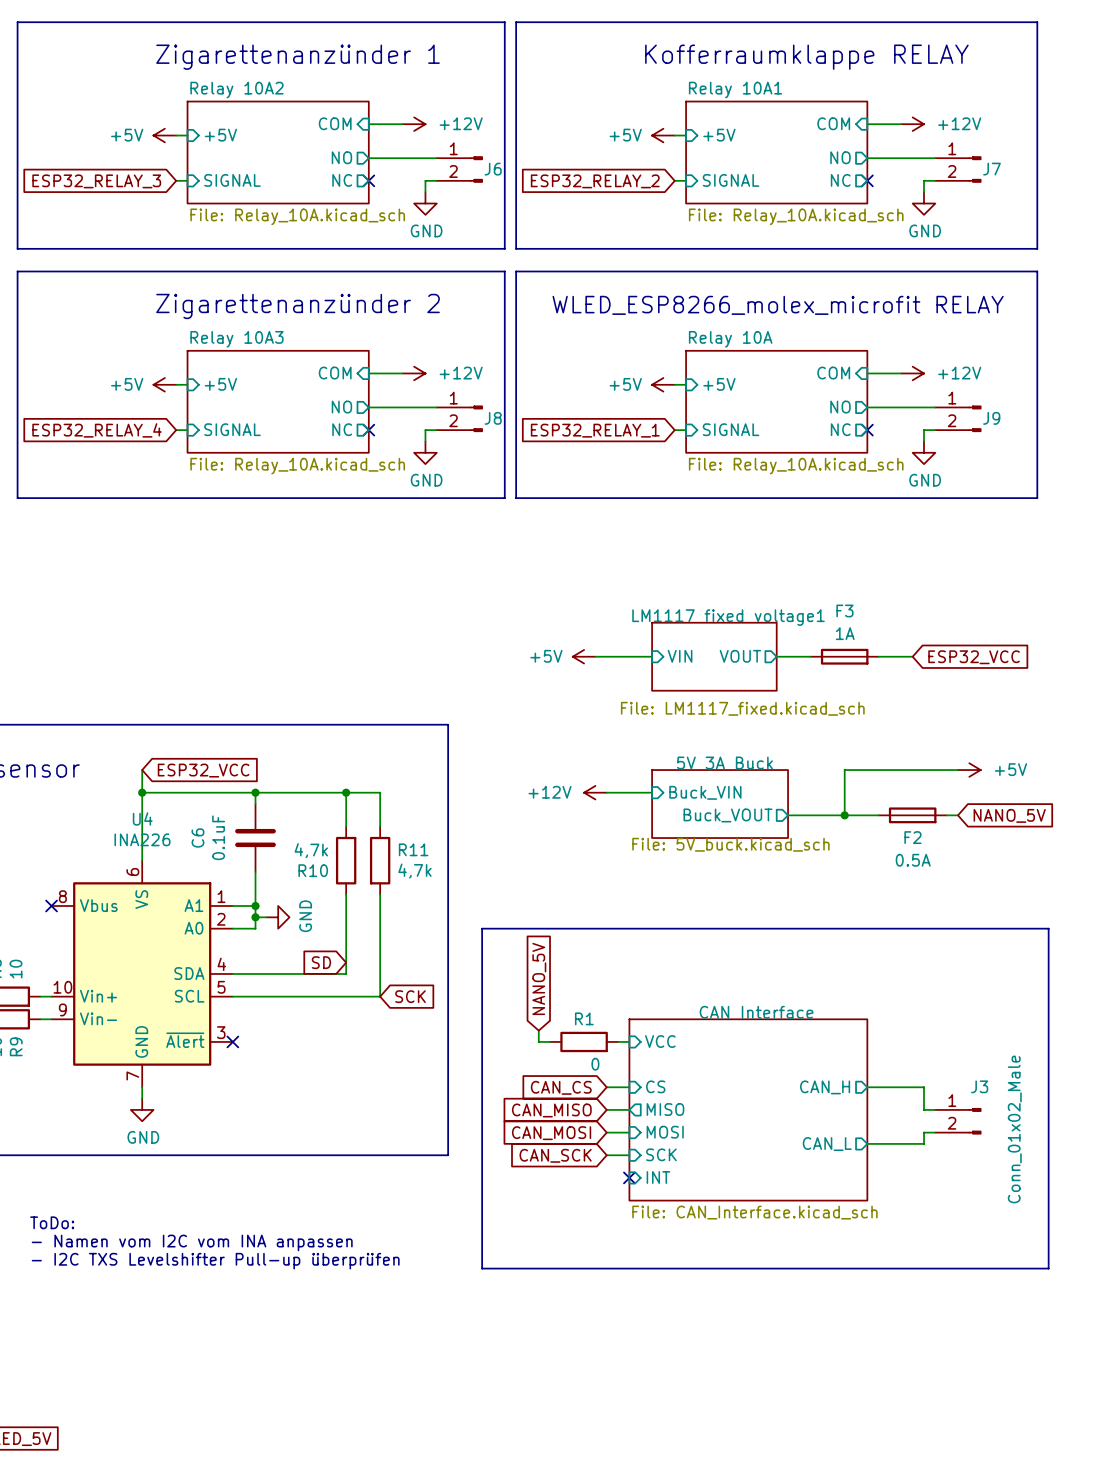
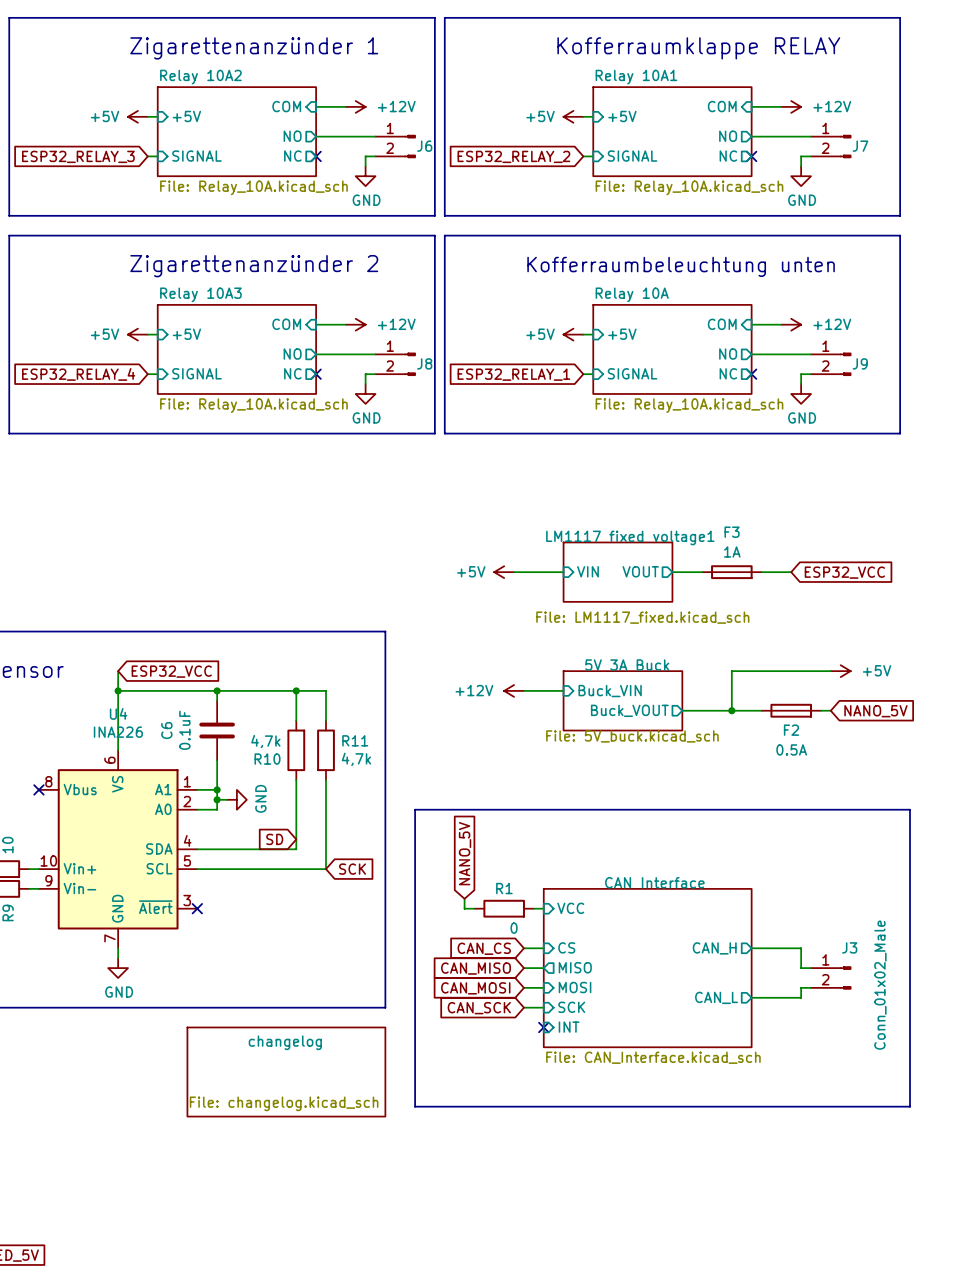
text: WLED_ESP8266_molex_microfit RELAY (778, 305) -> none
text: none -> Kofferraumbeleuchtung unten (681, 266)
text: ToDo: (52, 1222) -> none
sheet changelog: none -> File: changelog.kicad_sch (286, 1072)
text: - Namen vom I2C vom INA anpassen (192, 1242) -> none
text: - I2C TXS Levelshifter Pull-up überprüfen (215, 1261) -> none

